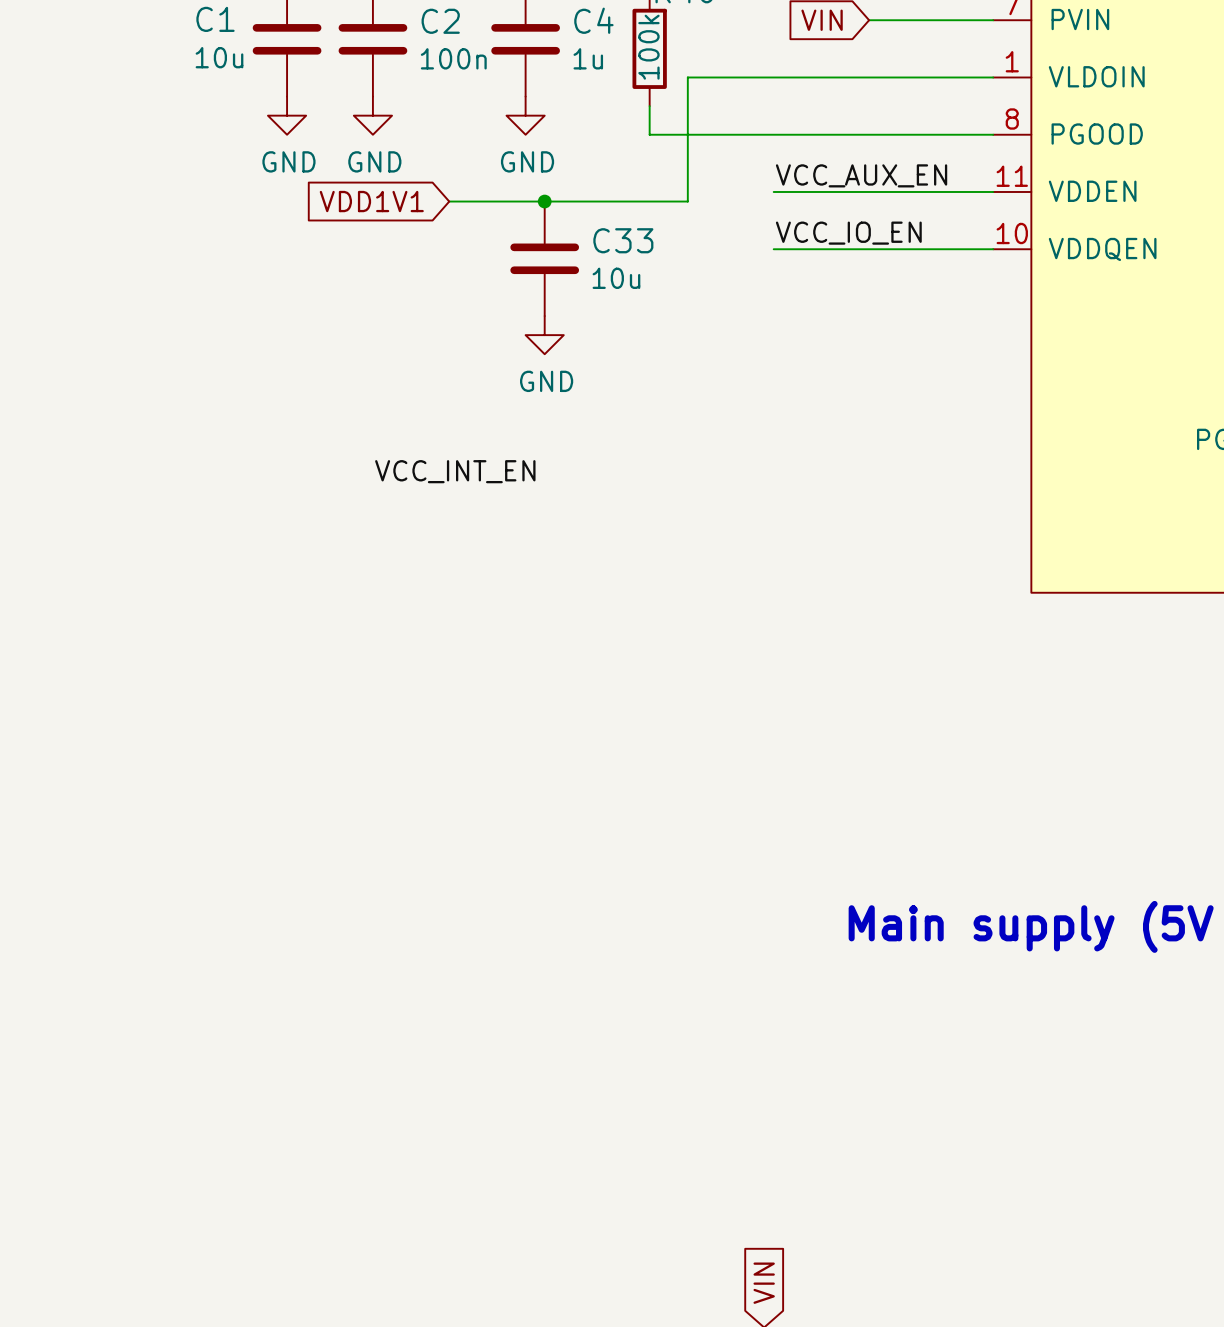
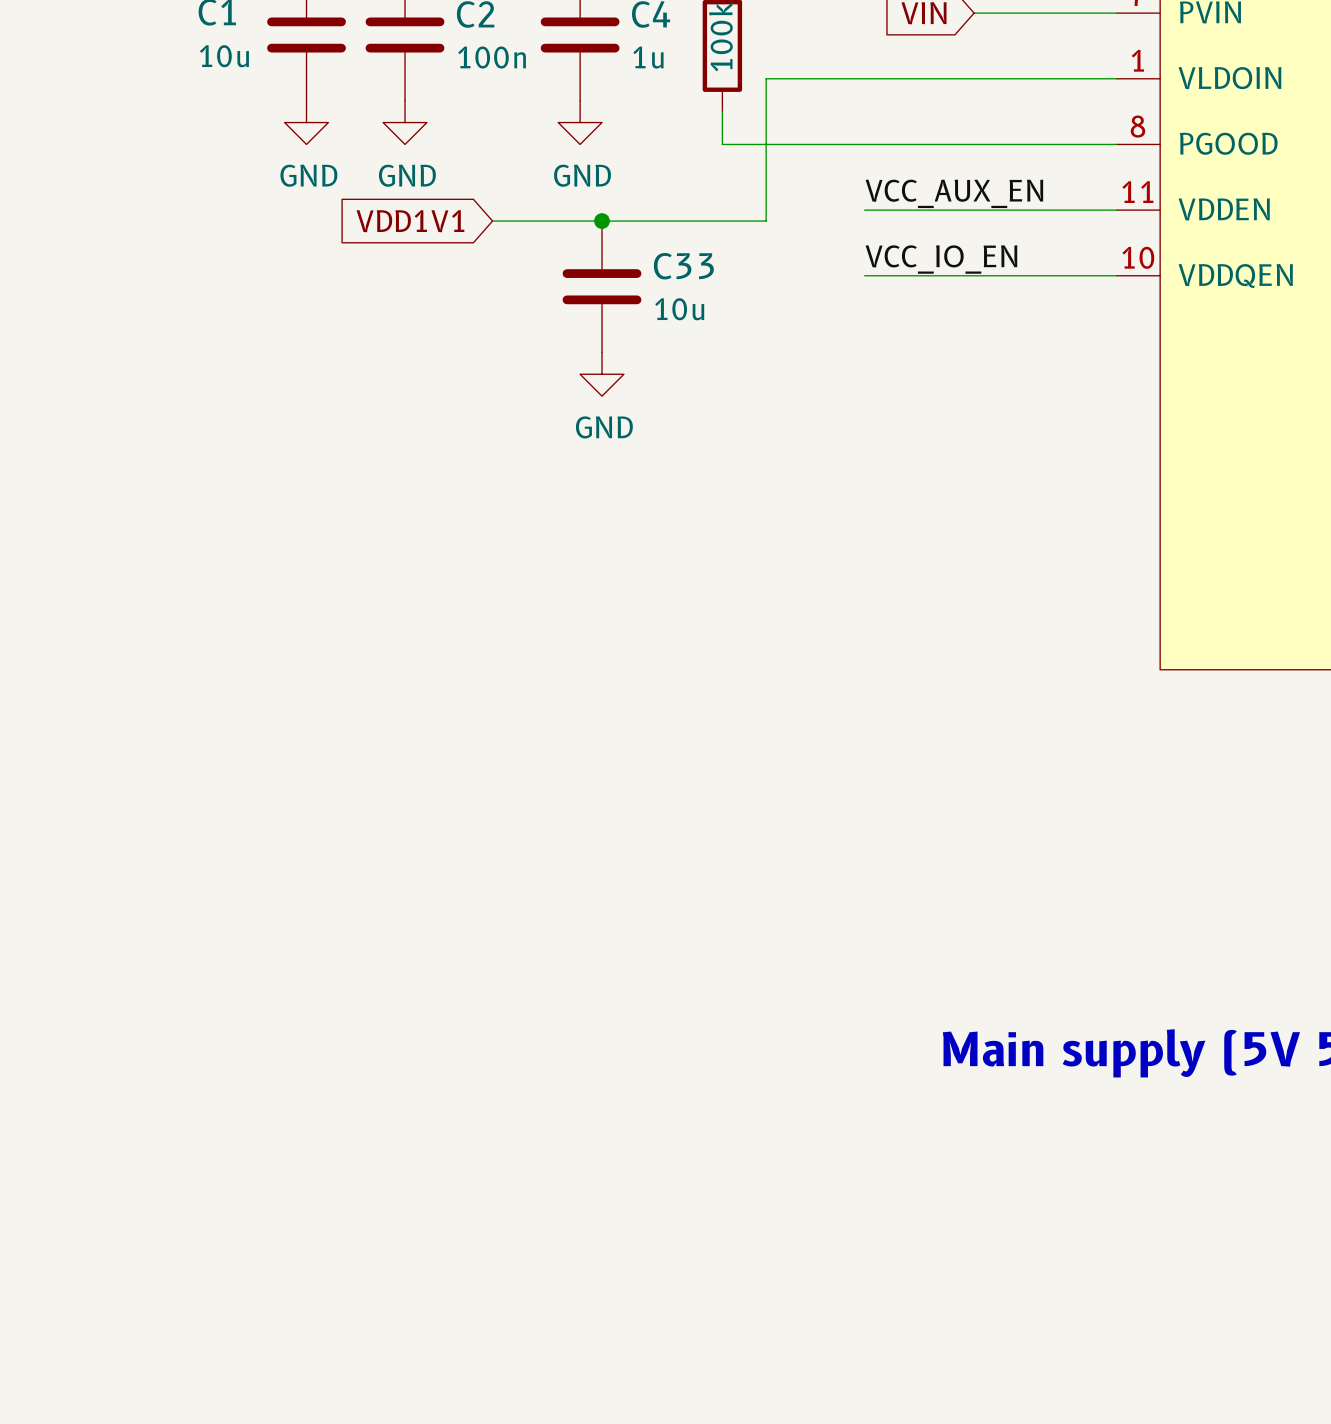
label: VCC_INT_EN (455, 471) -> none

